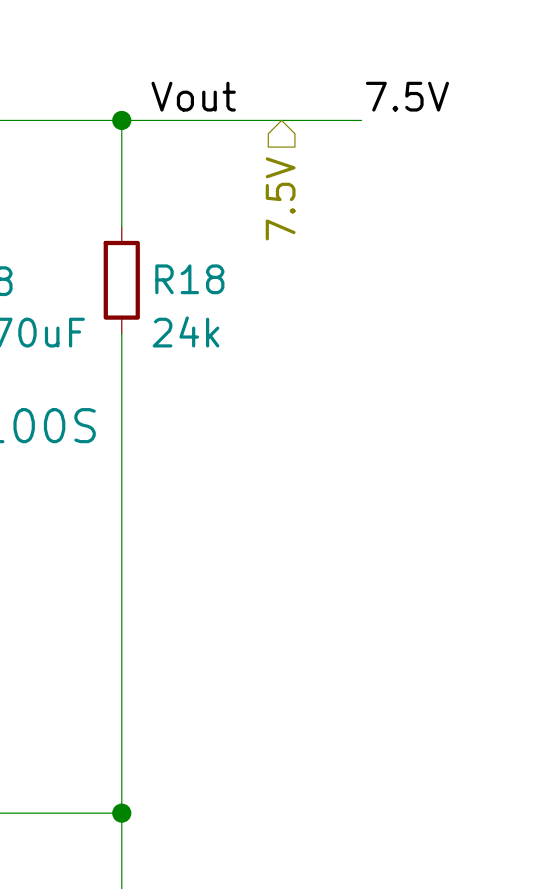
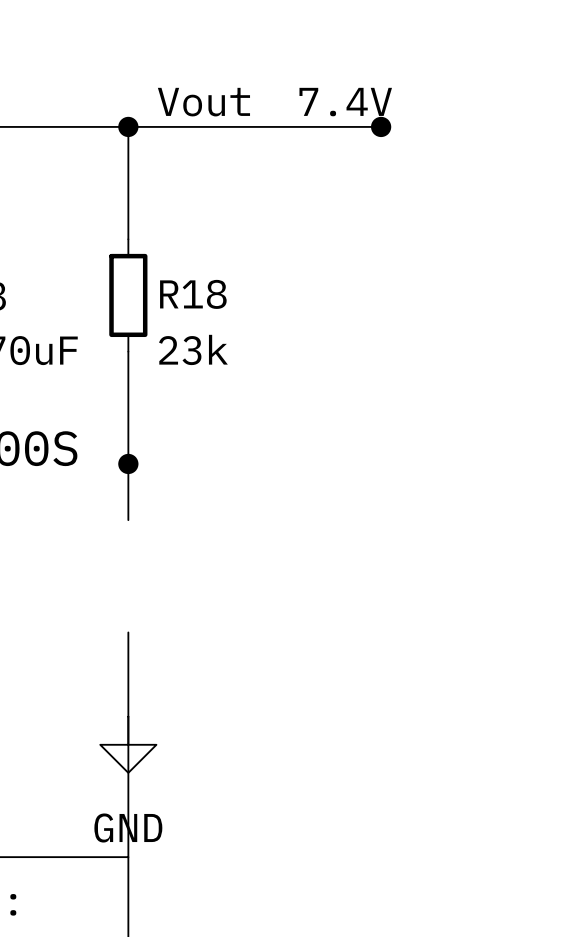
label: 7.5V (407, 96) -> 7.4V (345, 102)
junction: none -> (381, 126)
hierarchical label: 7.5V (280, 198) -> none
R18 value: 24k (186, 331) -> 23k (193, 349)
junction: none -> (128, 463)
wire: (121, 493) (121, 600) -> none
power symbol: none -> GND (128, 744)
junction: (121, 813) -> none

